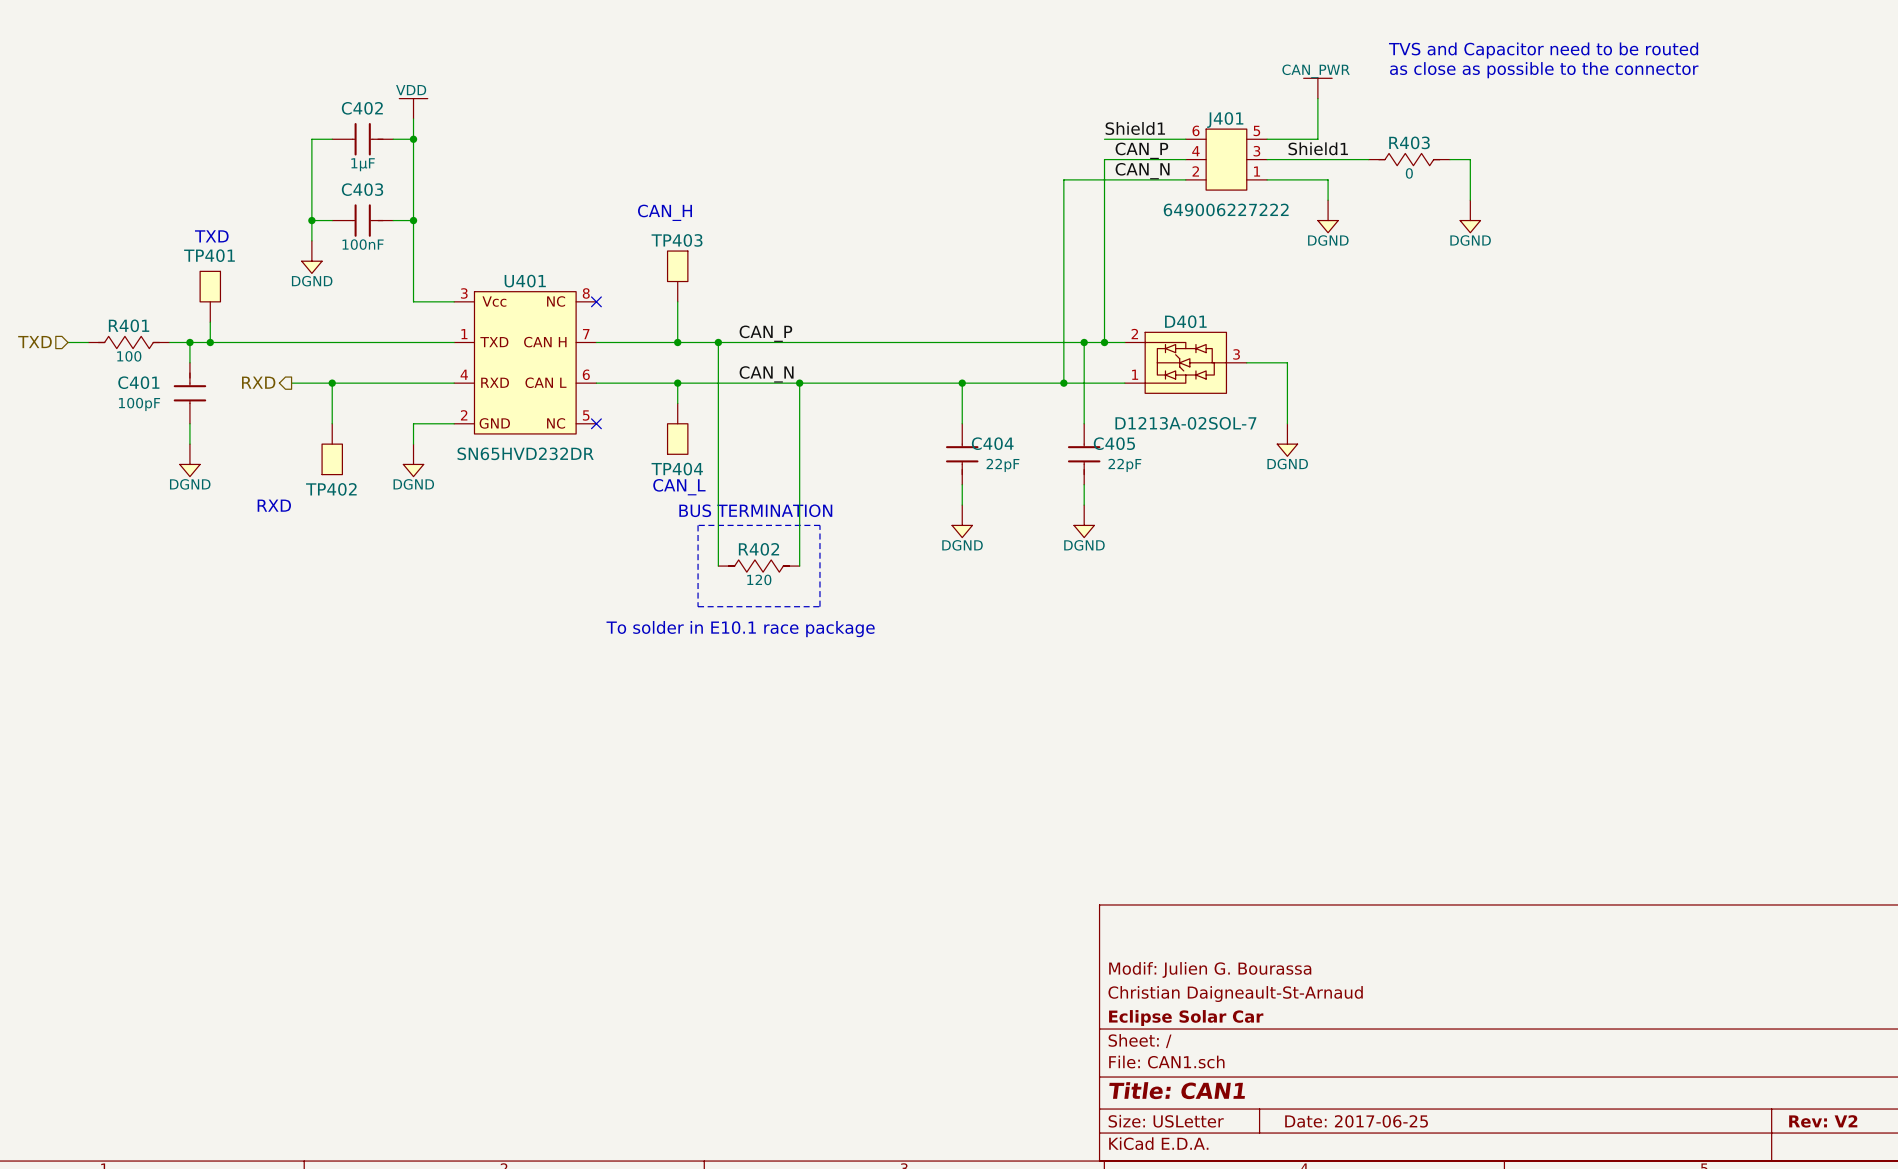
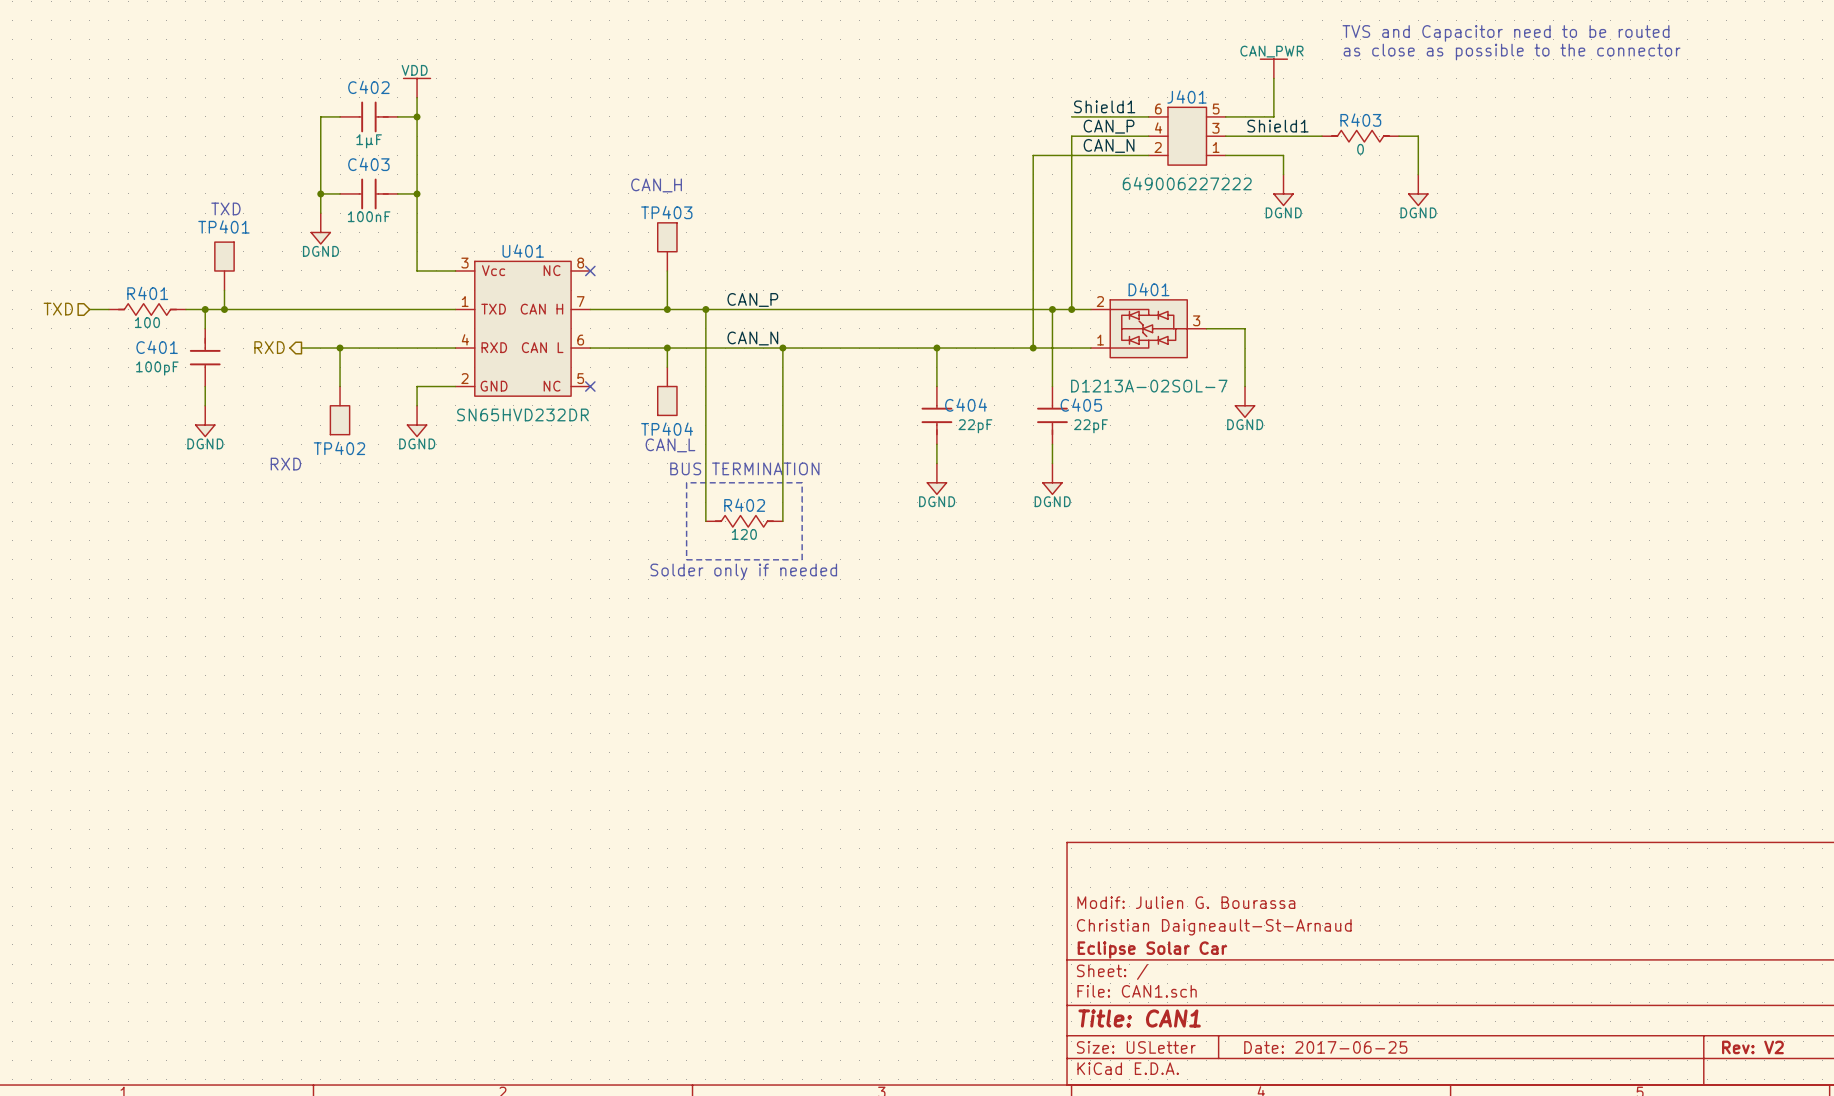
text: none -> Solder only if needed (743, 571)
text: To solder in E10.1 race package (740, 629) -> none

